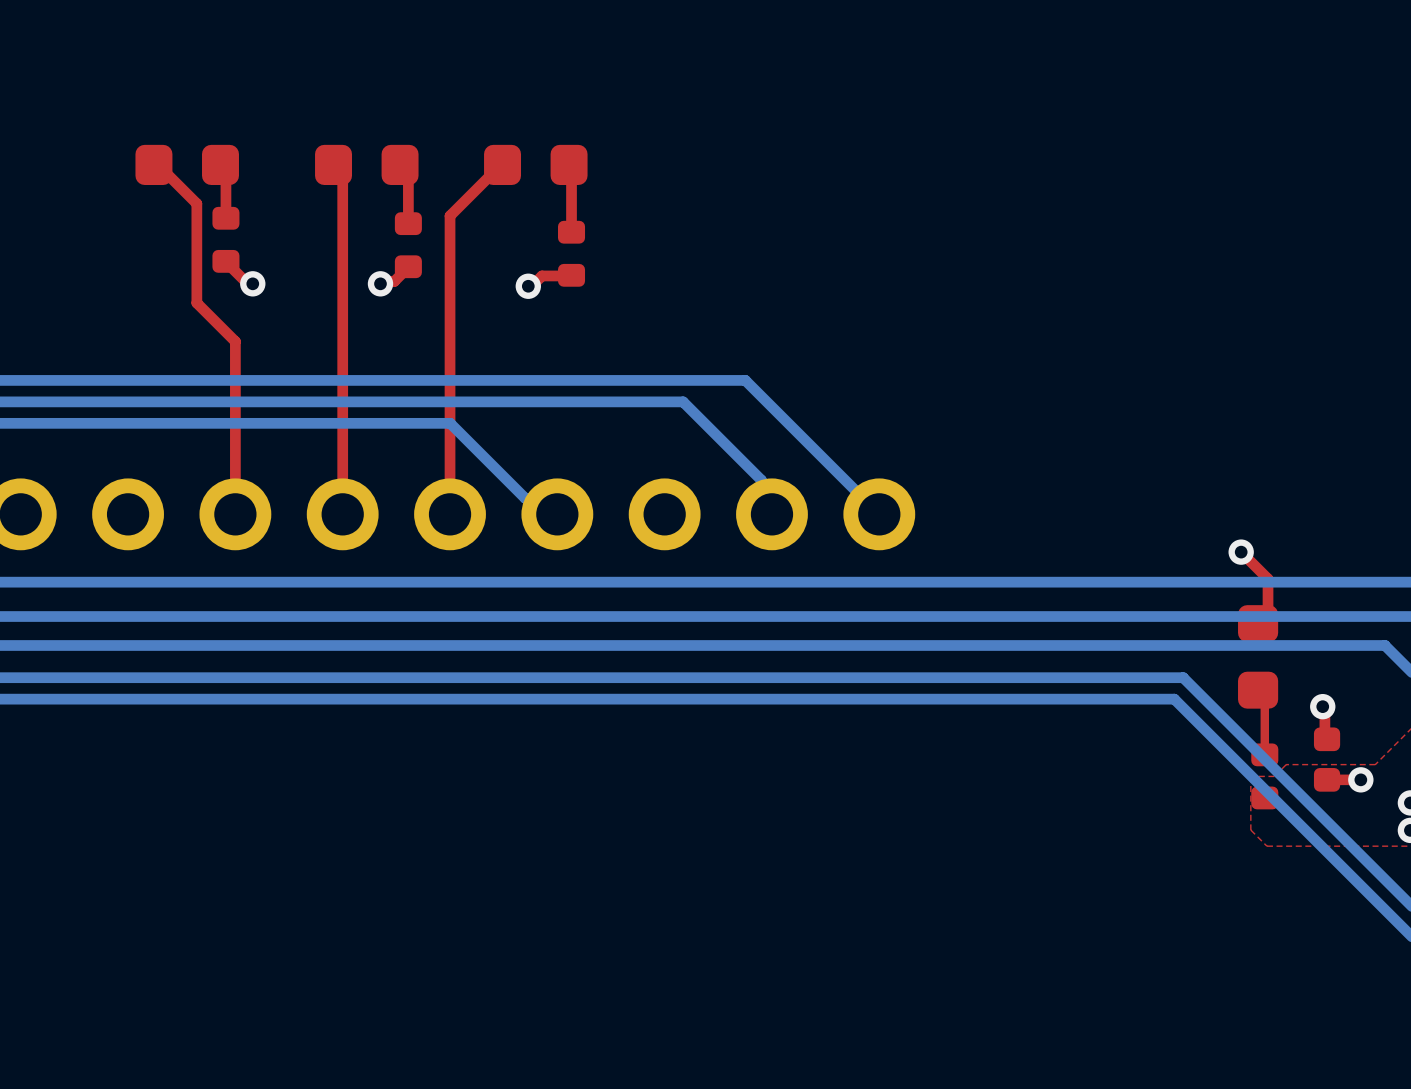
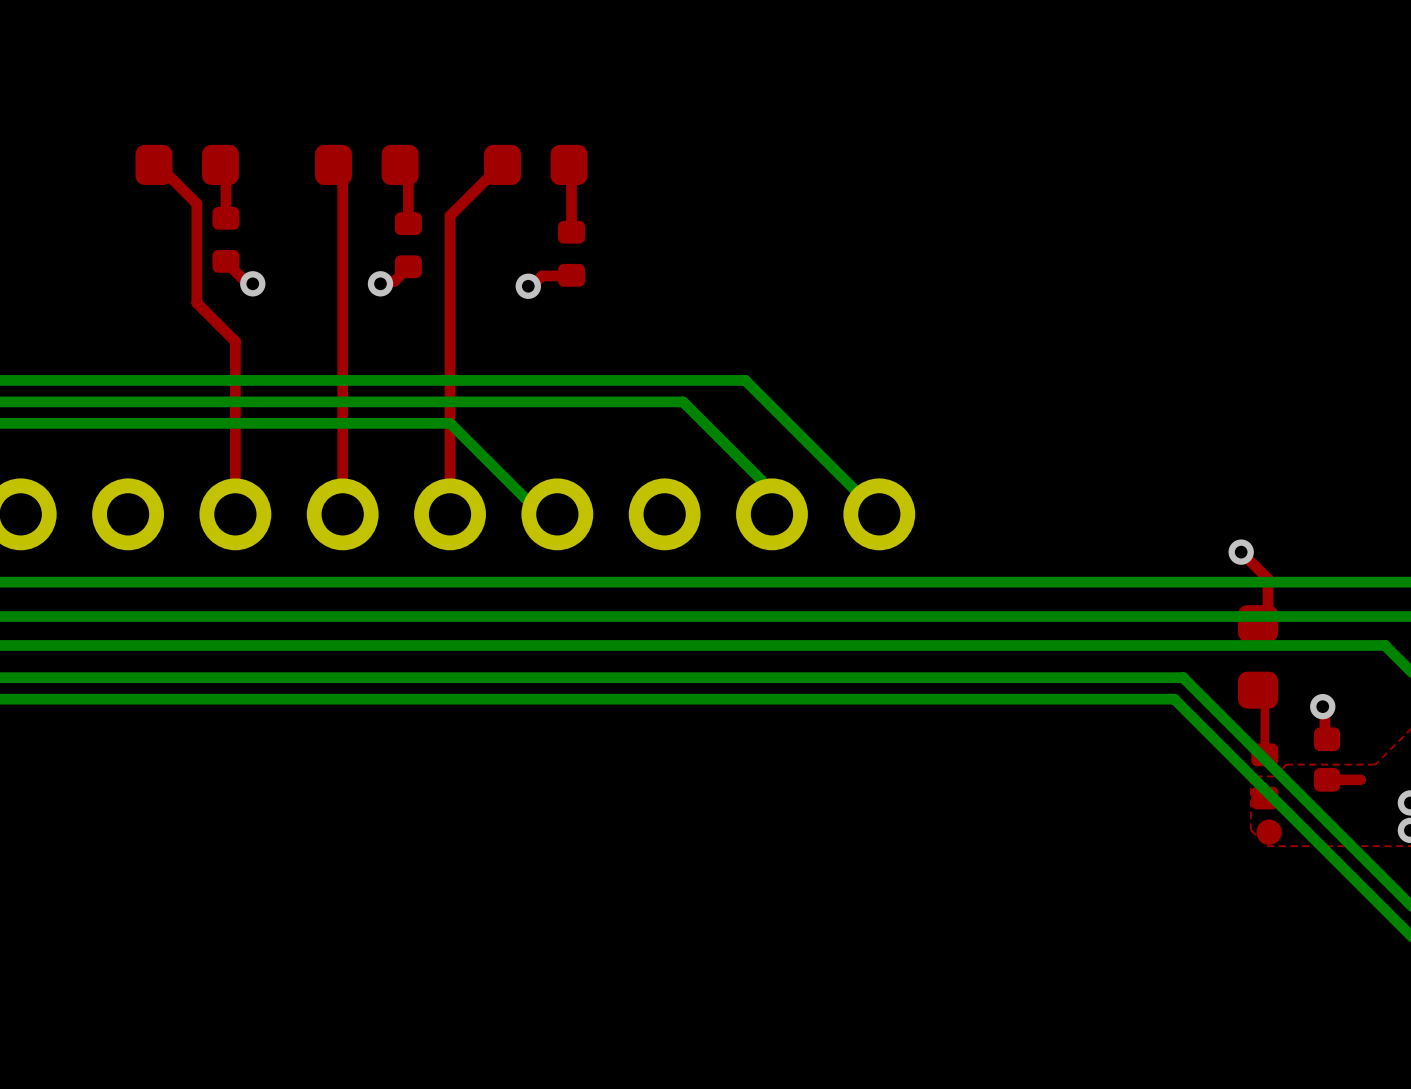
via: (1360, 779) -> none
part: none -> (1269, 832)

